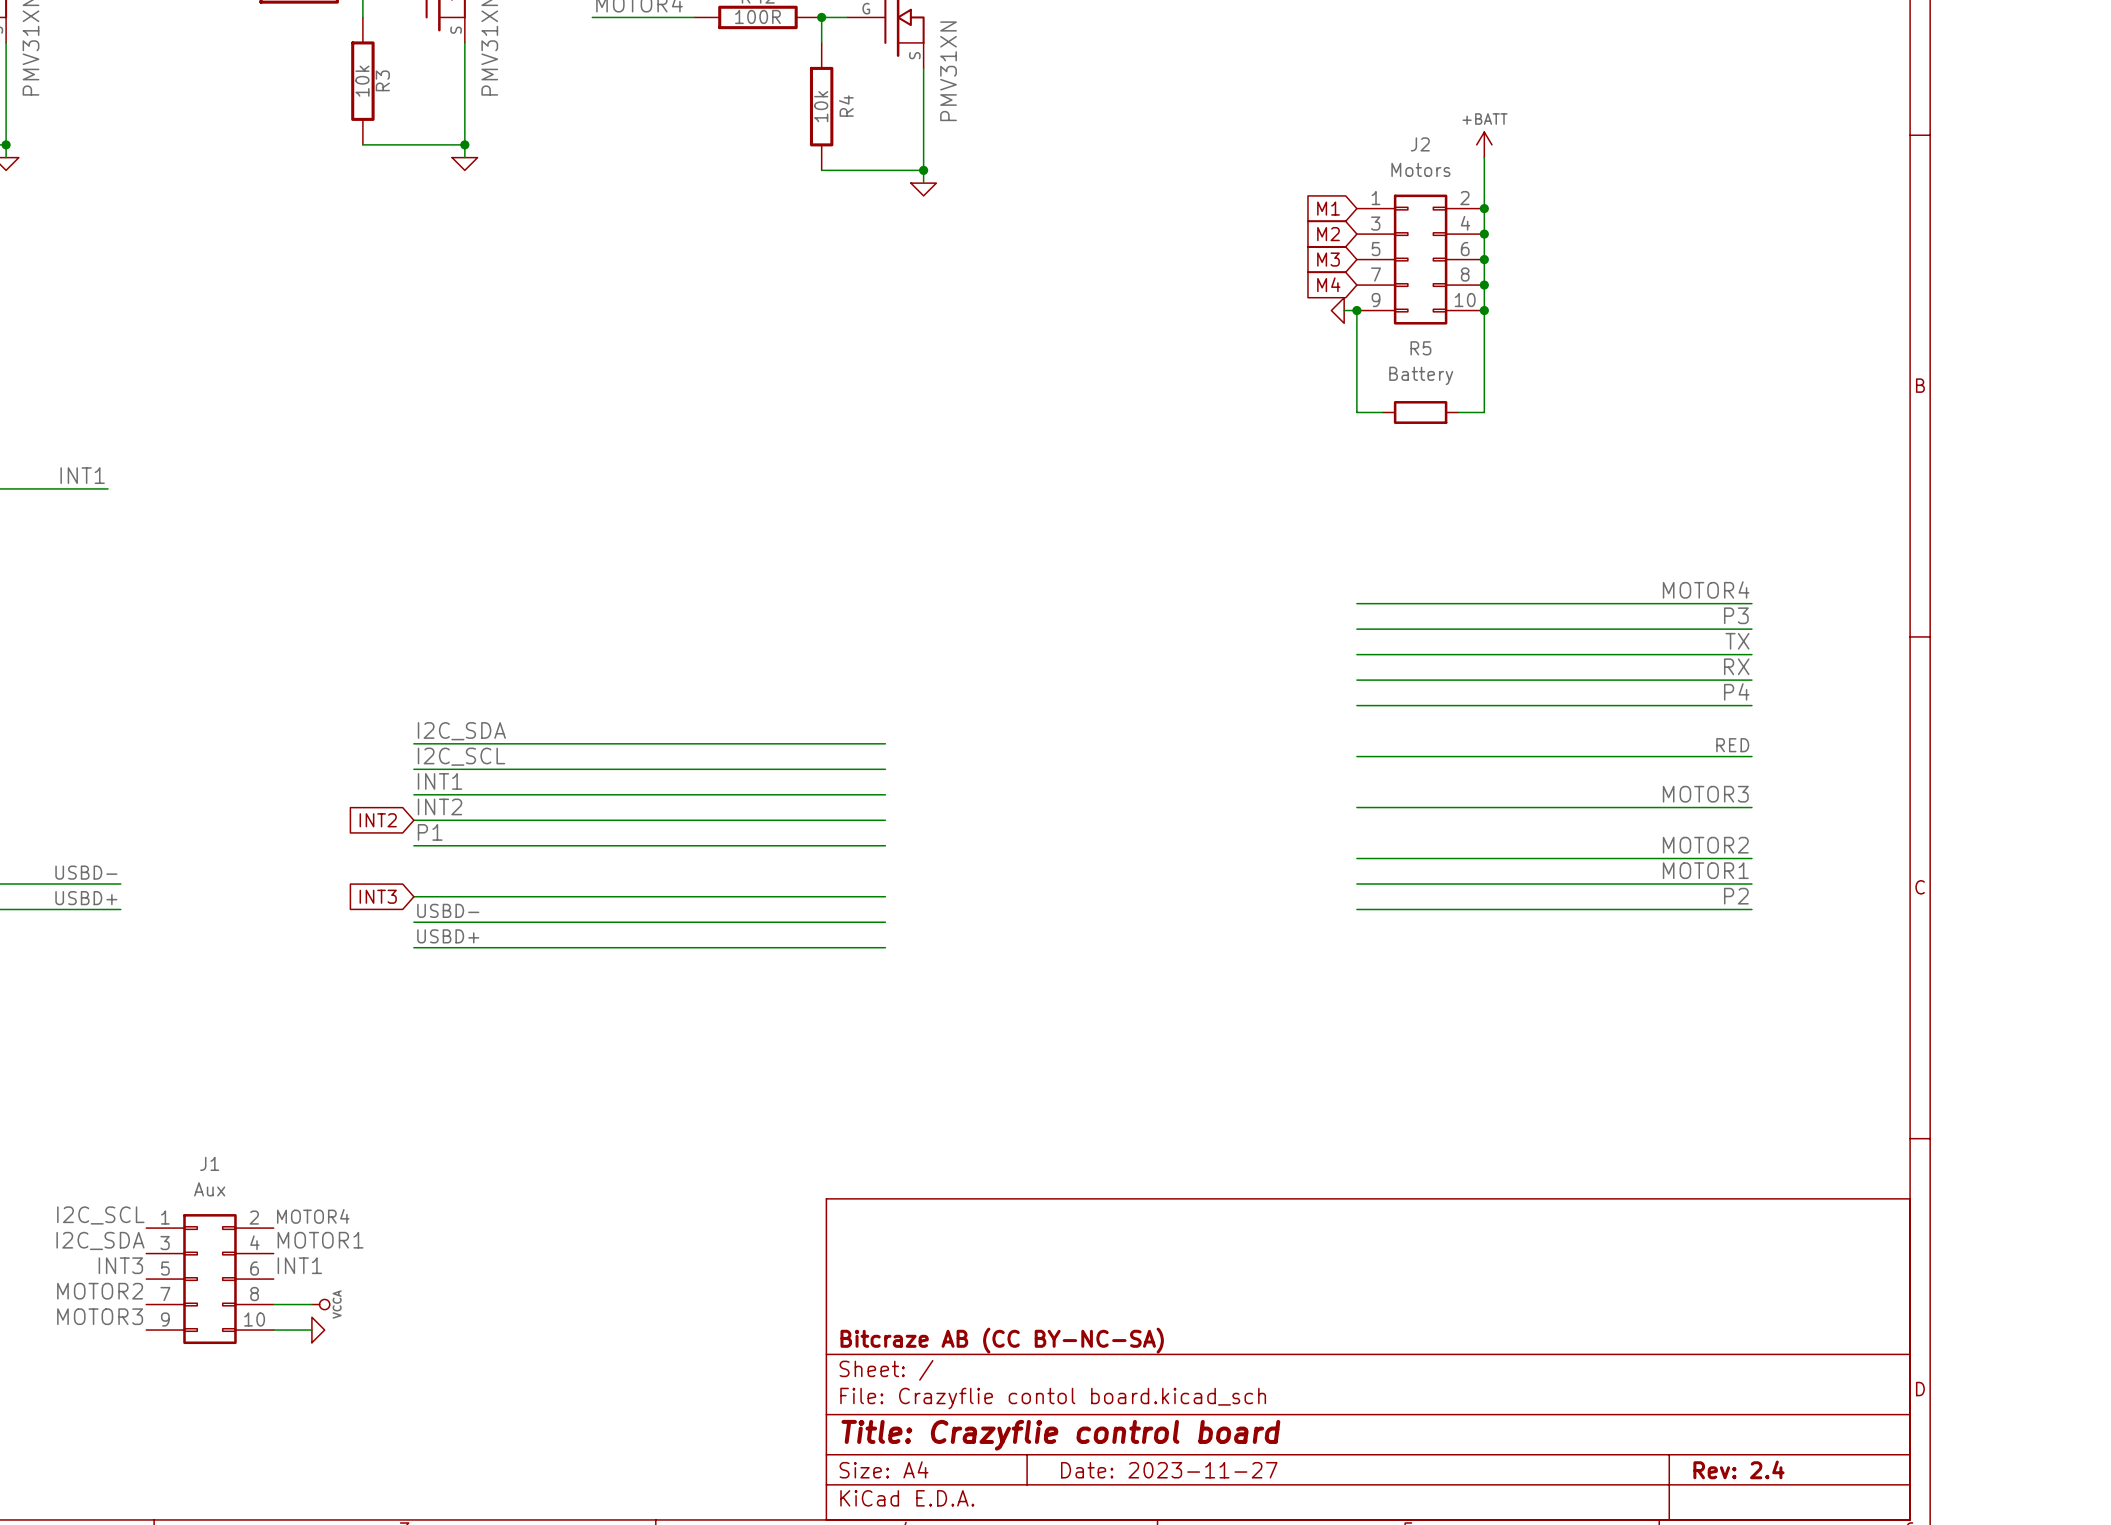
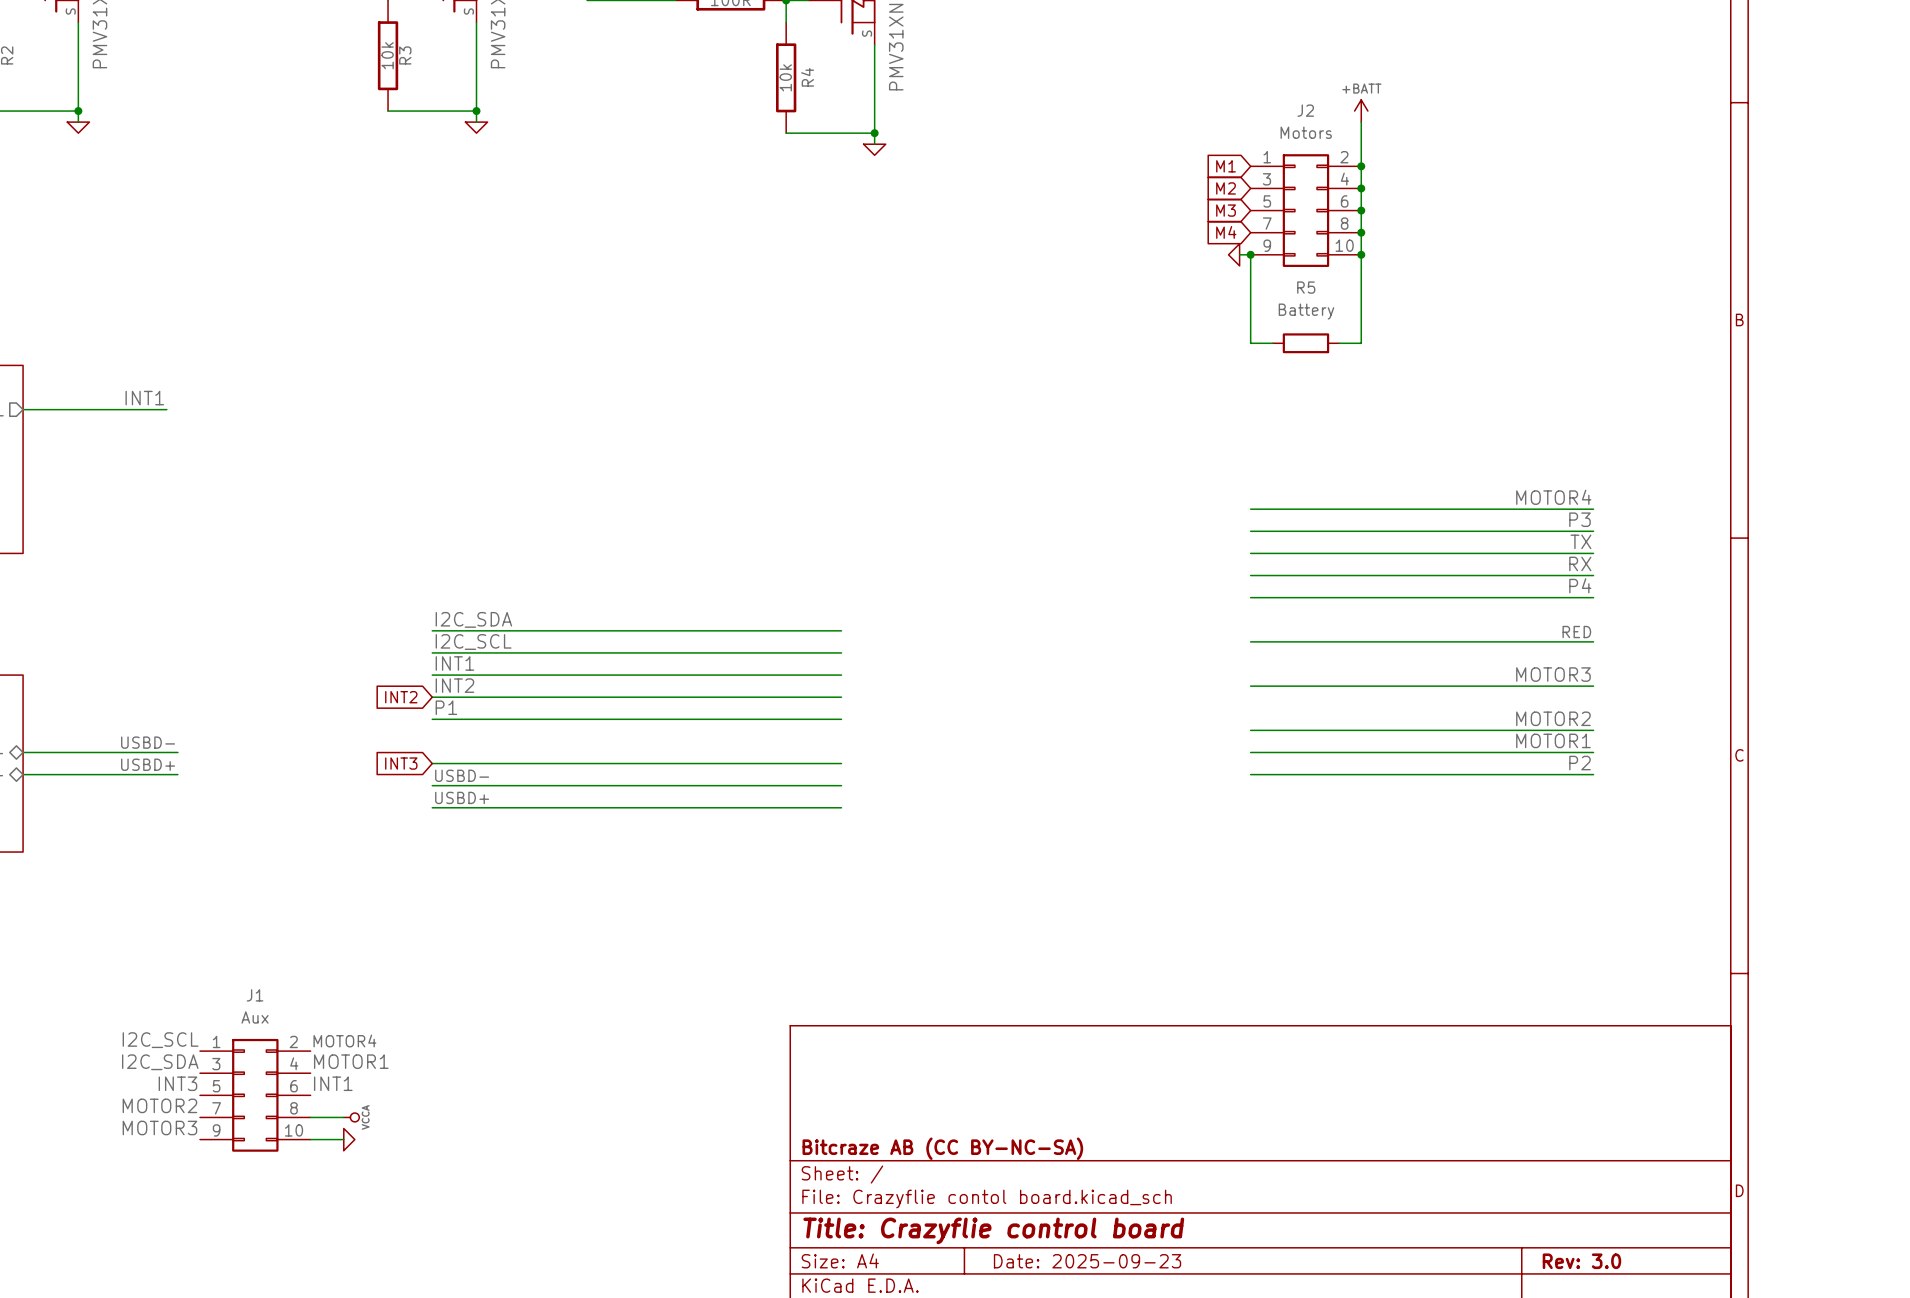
title block: Rev: 2.4 (1738, 1469) -> Rev: 3.0 (1581, 1261)
title block: Date: 2023-11-27 (1169, 1470) -> Date: 2025-09-23 (1087, 1261)

